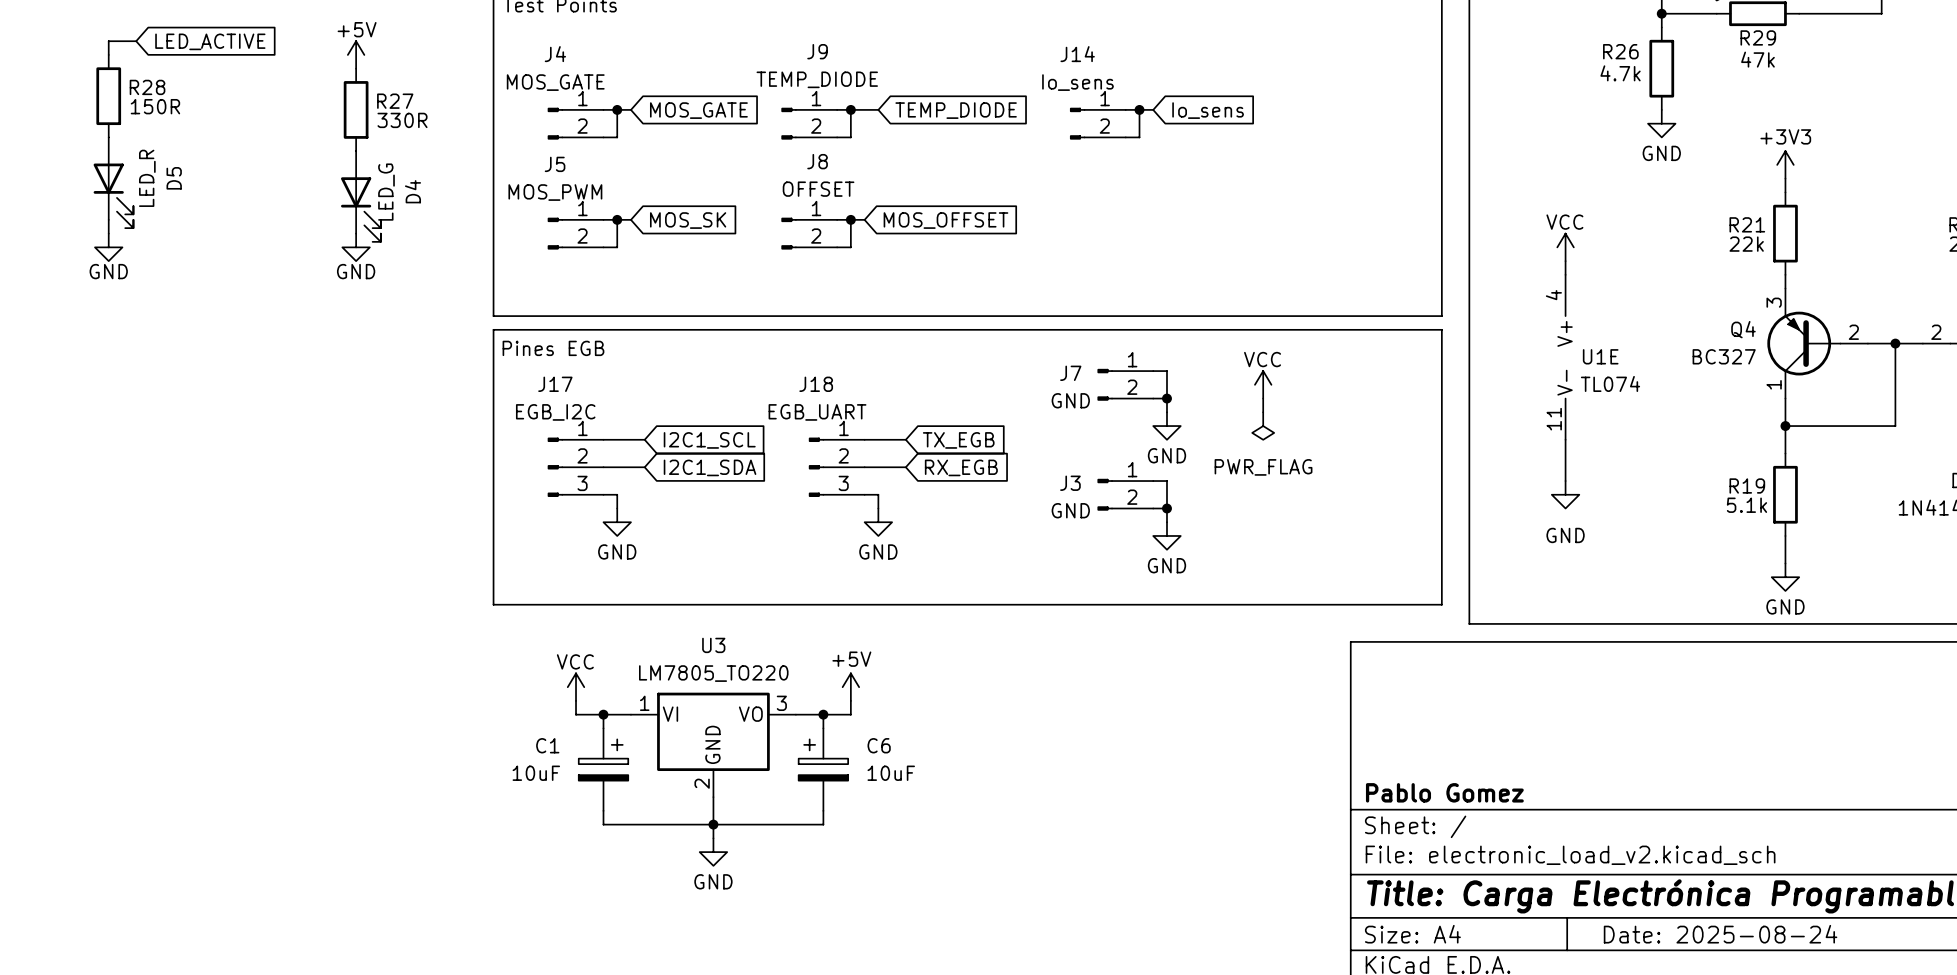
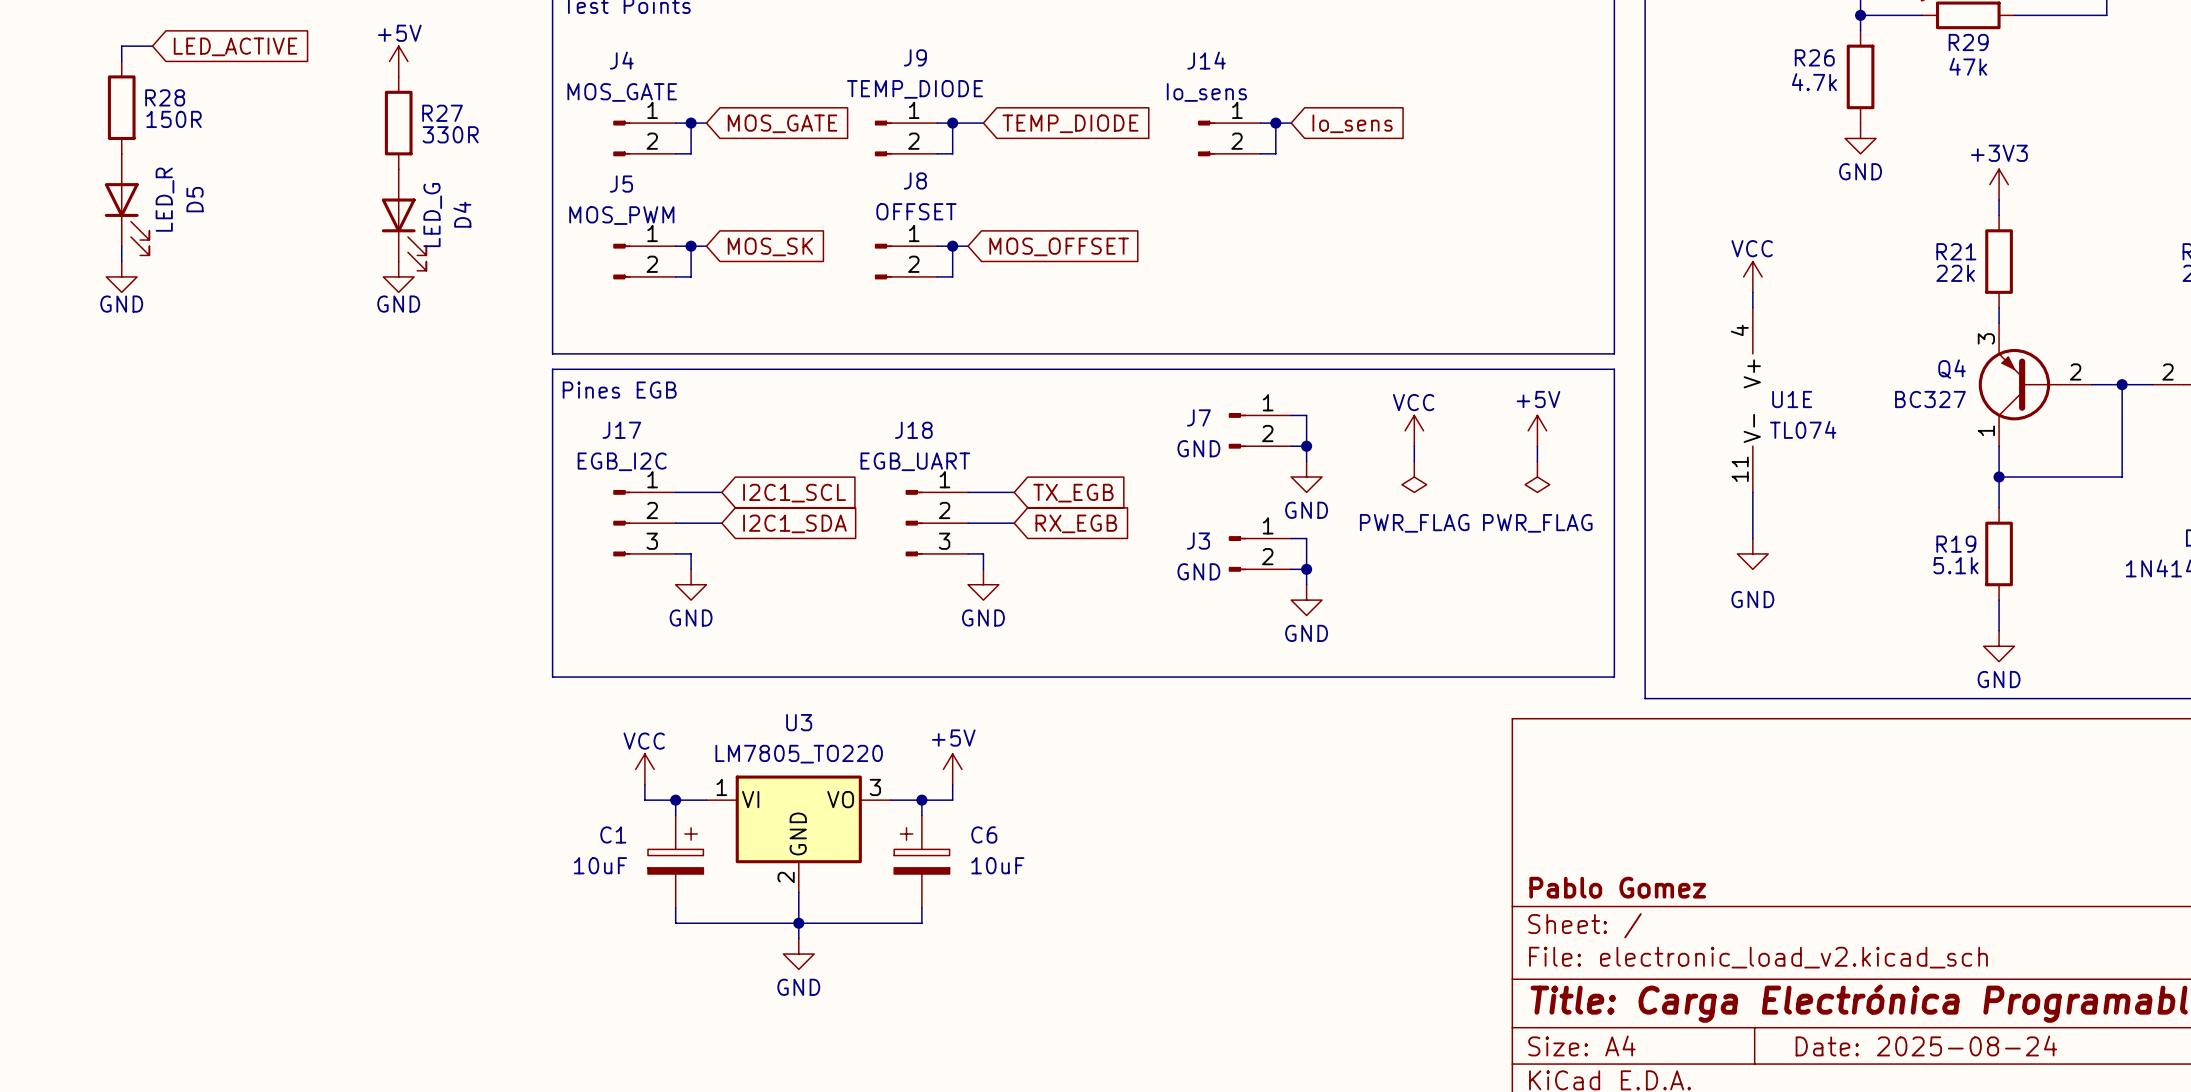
power symbol: none -> +5V (1537, 430)
wire: none -> (1537, 446) (1537, 461)
power symbol: none -> PWR_FLAG (1537, 477)

